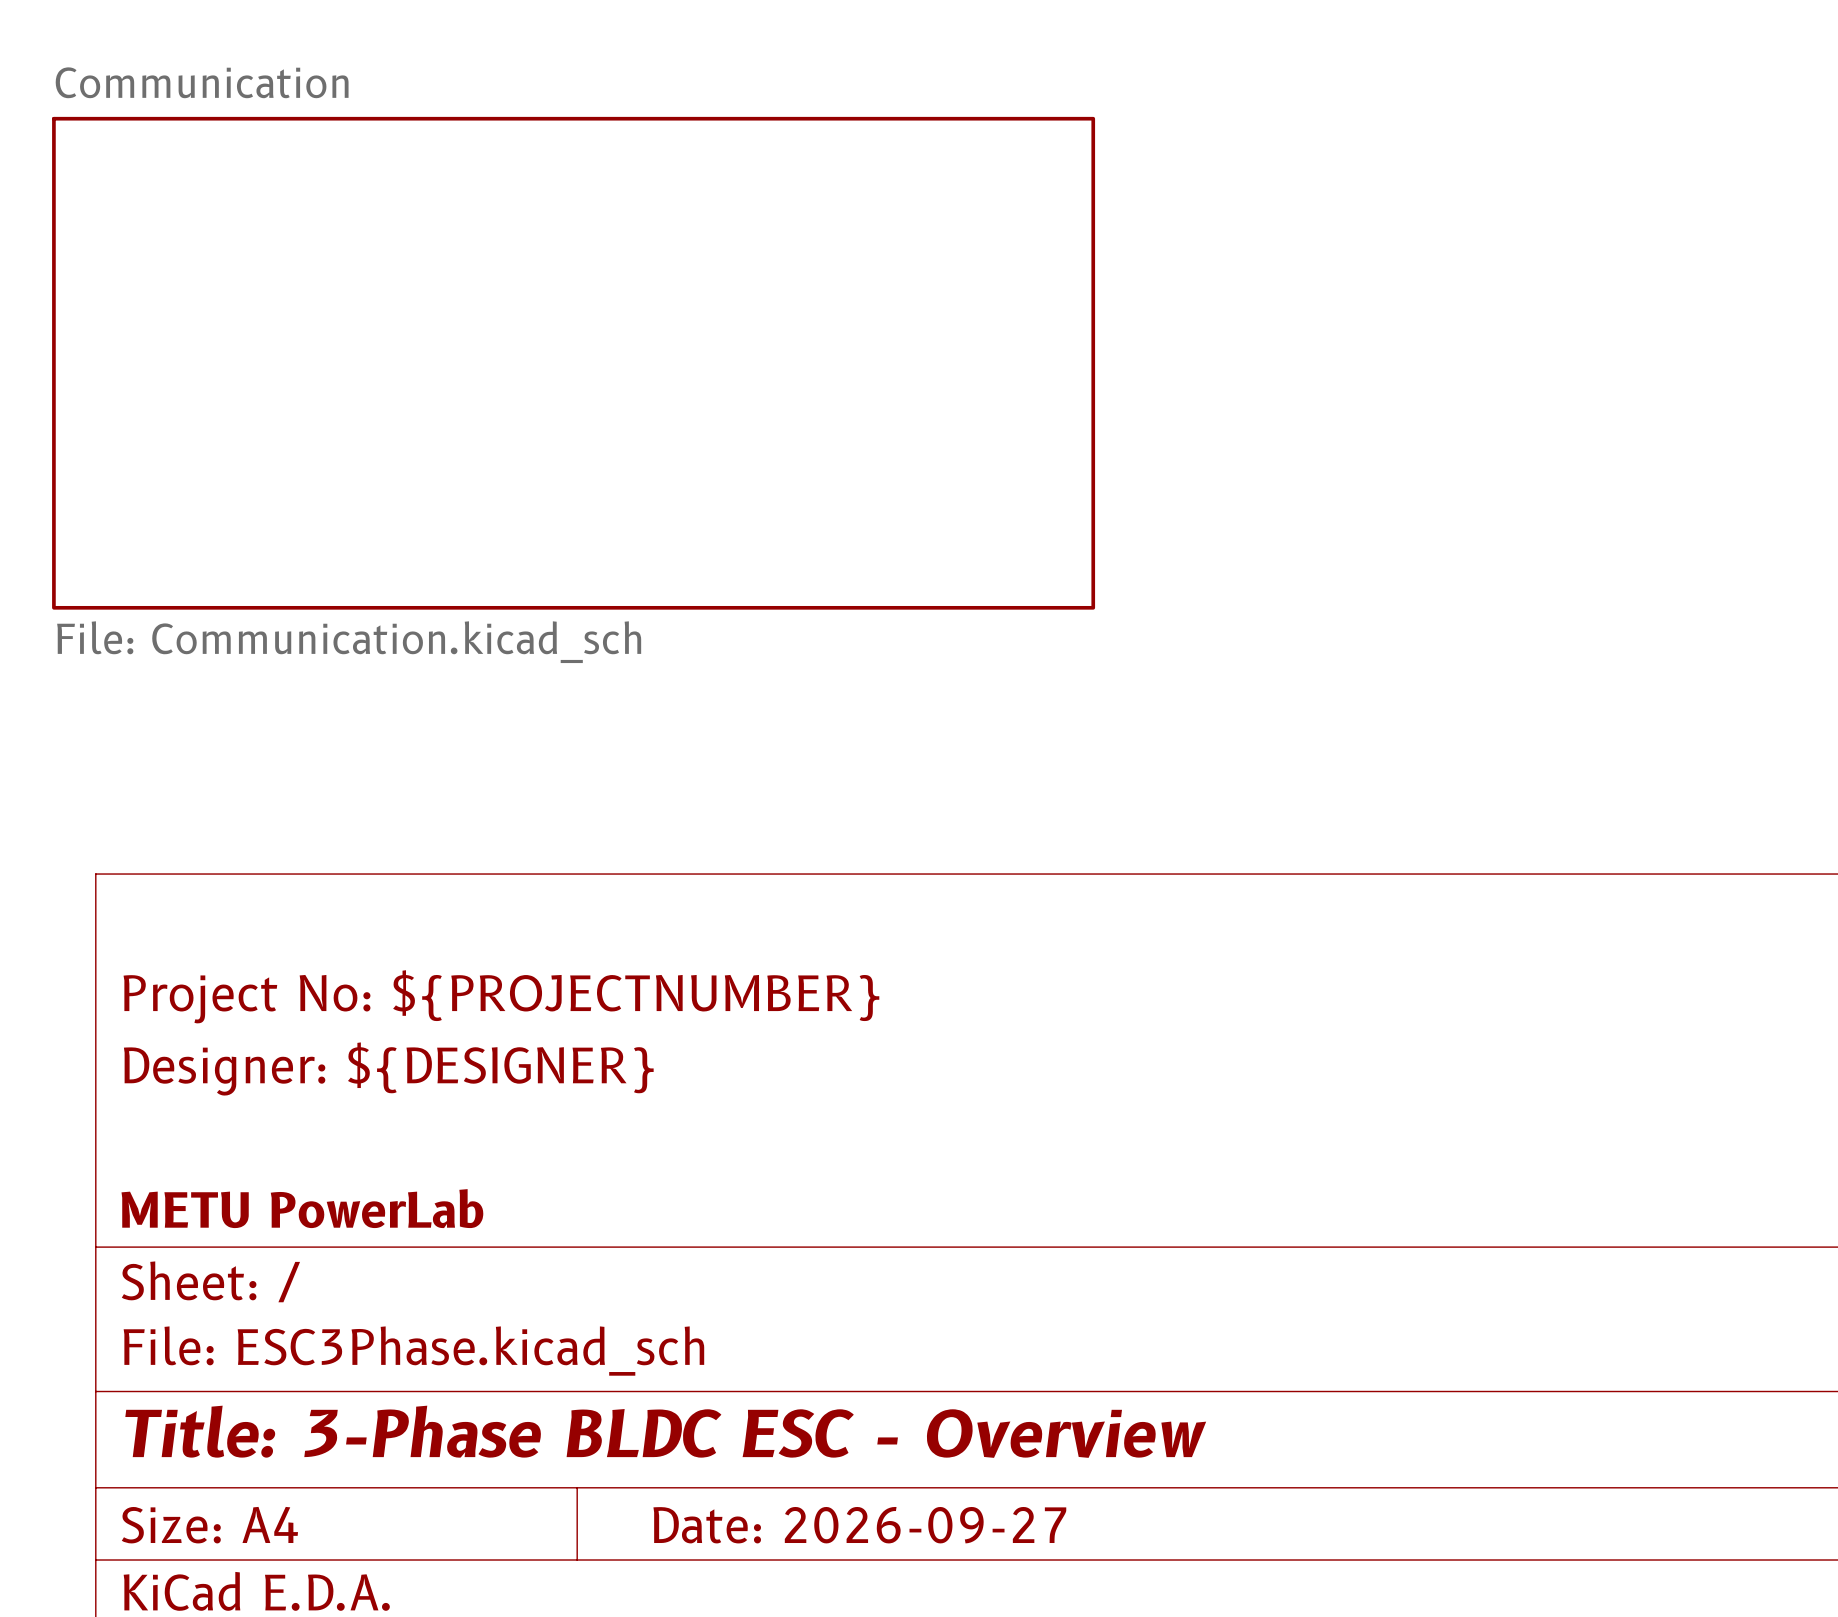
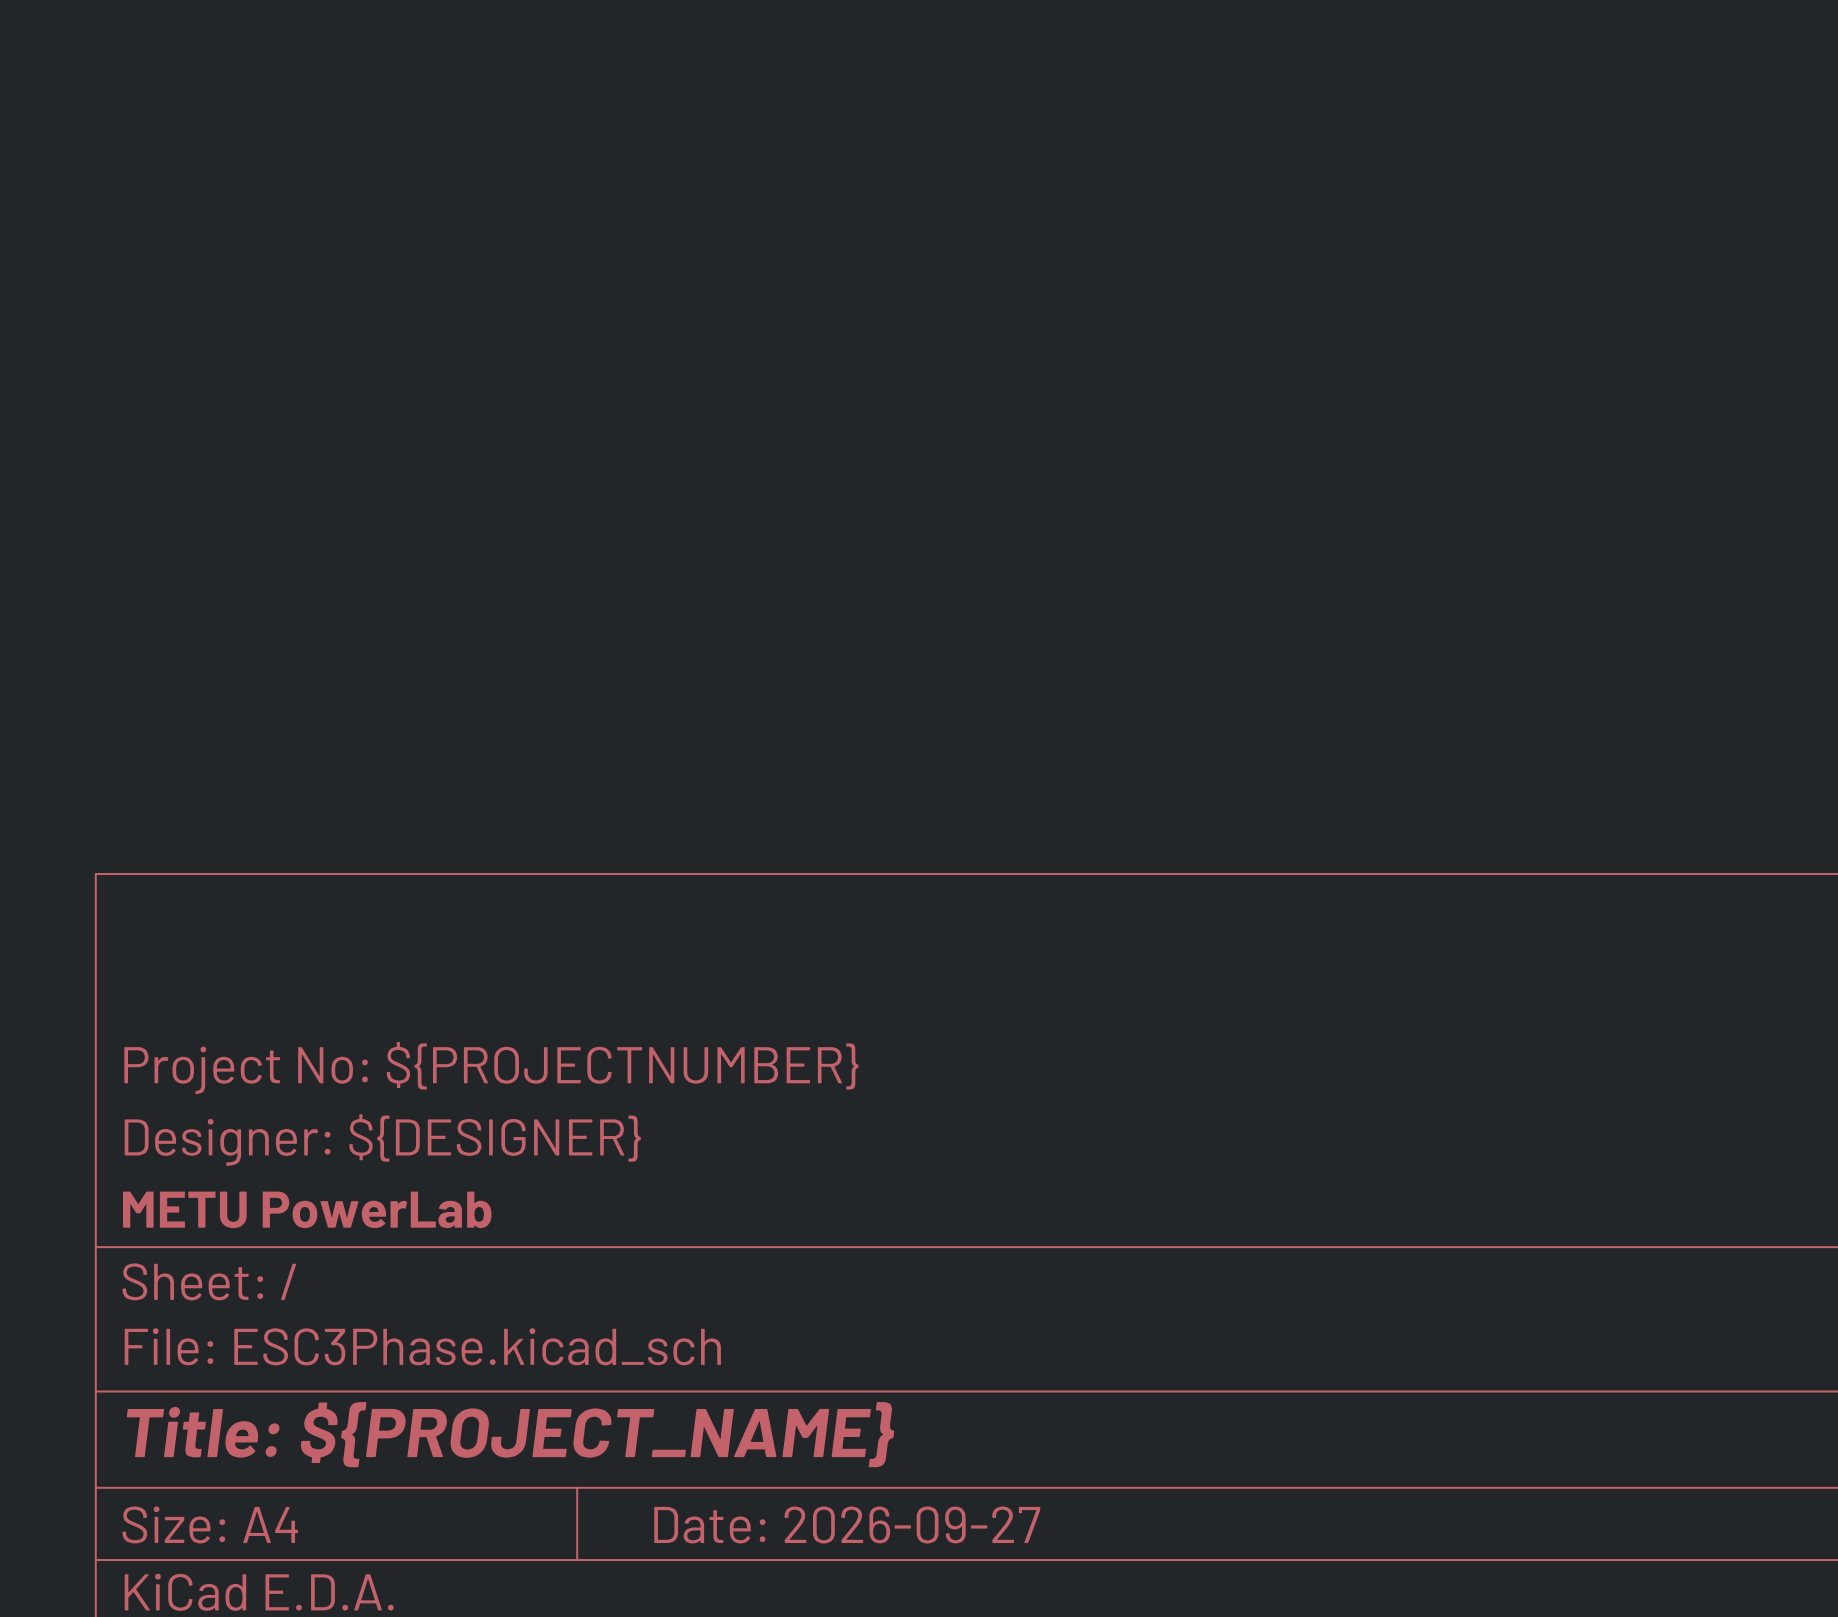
sheet Communication: File: Communication.kicad_sch (573, 363) -> none
title block: Project No: ${PROJECTNUMBER} (501, 996) -> none
title block: Designer: ${DESIGNER} (388, 1068) -> Project No: ${PROJECTNUMBER} (491, 1068)
title block: none -> Designer: ${DESIGNER} (382, 1140)
title block: Title: 3-Phase BLDC ESC - Overview (665, 1431) -> Title: ${PROJECT_NAME} (510, 1434)

